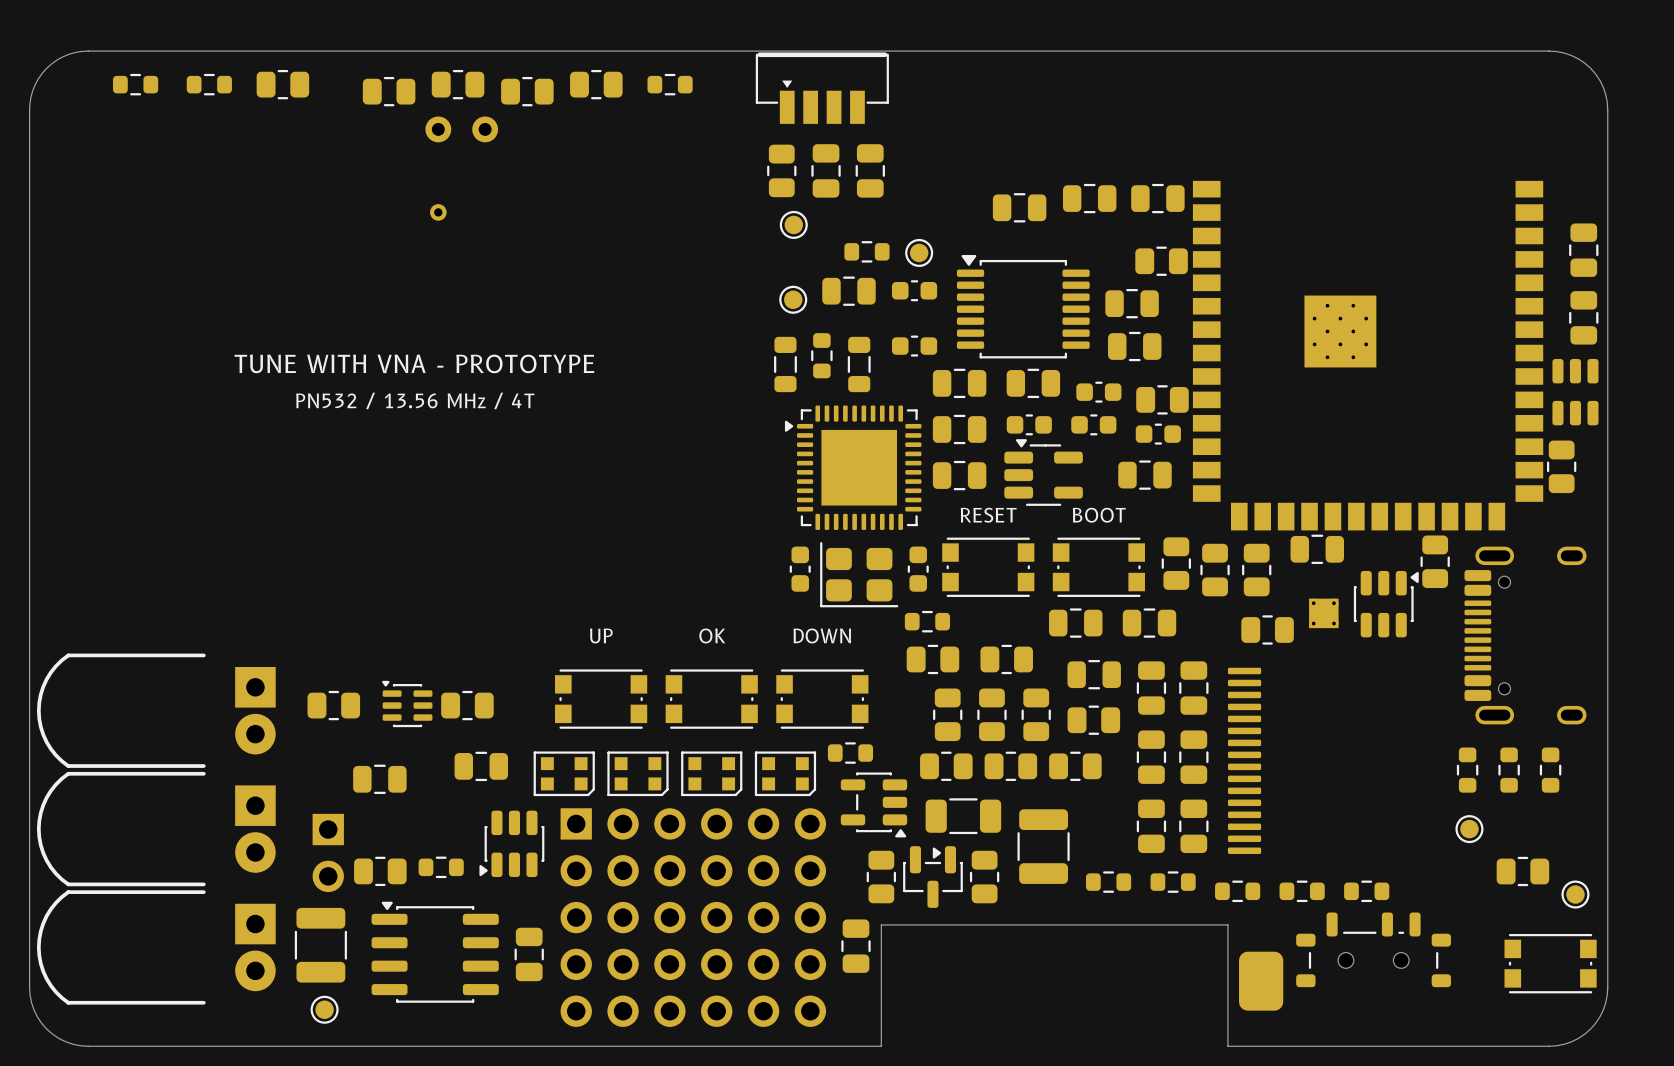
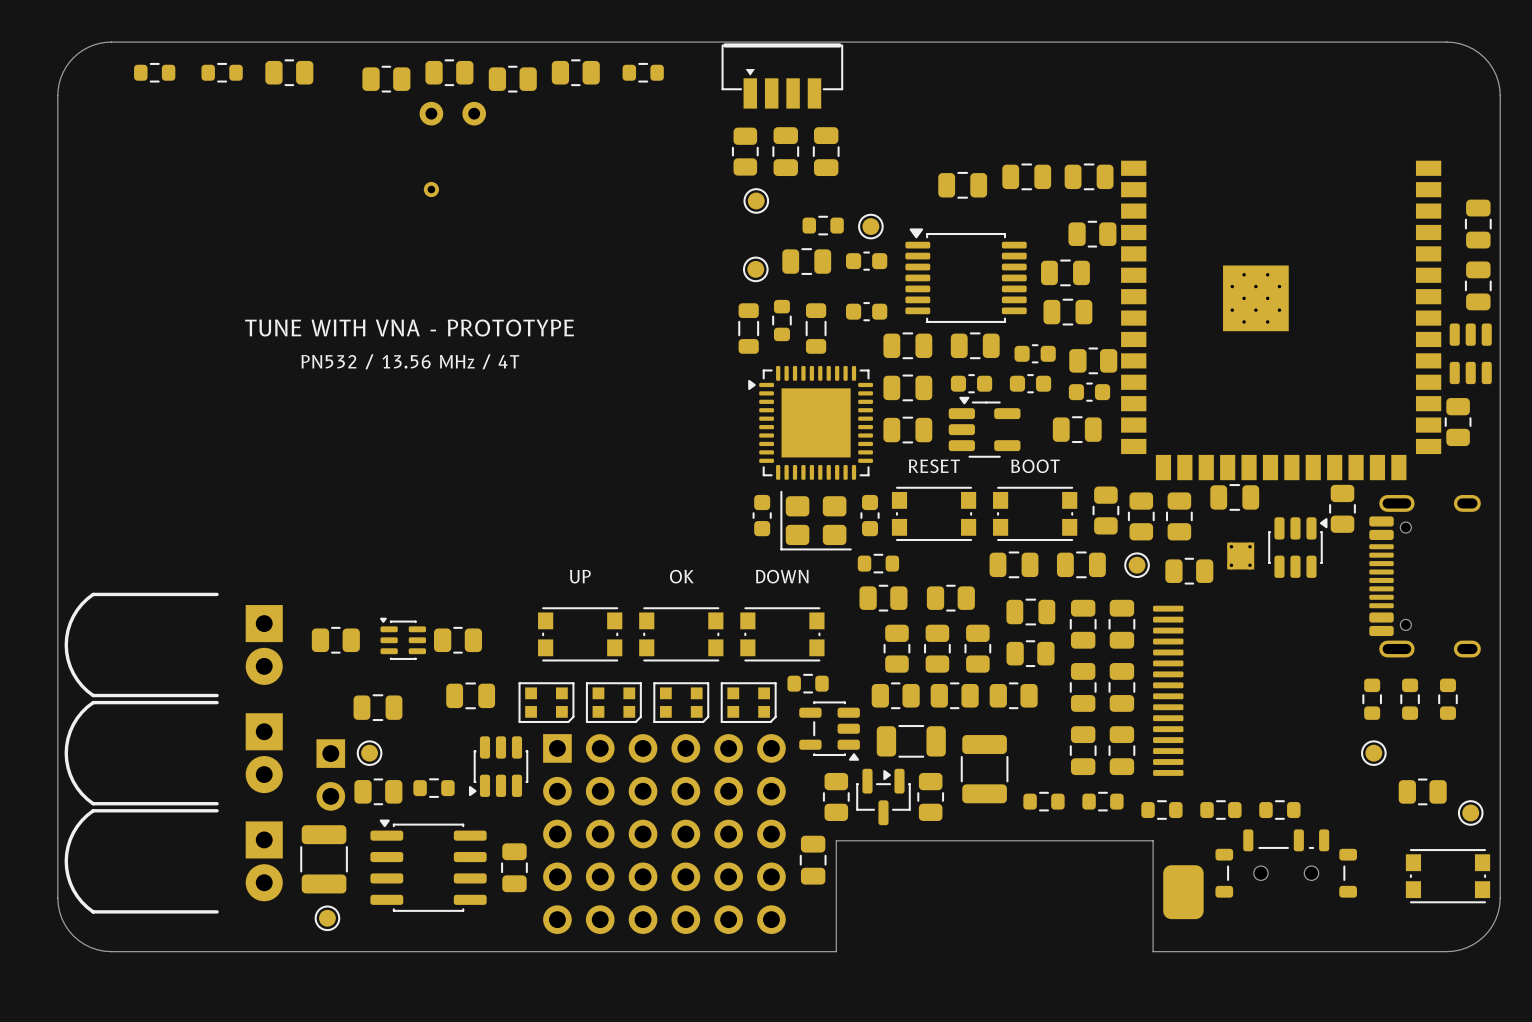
part: none -> (1137, 565)
part: none -> (369, 753)

